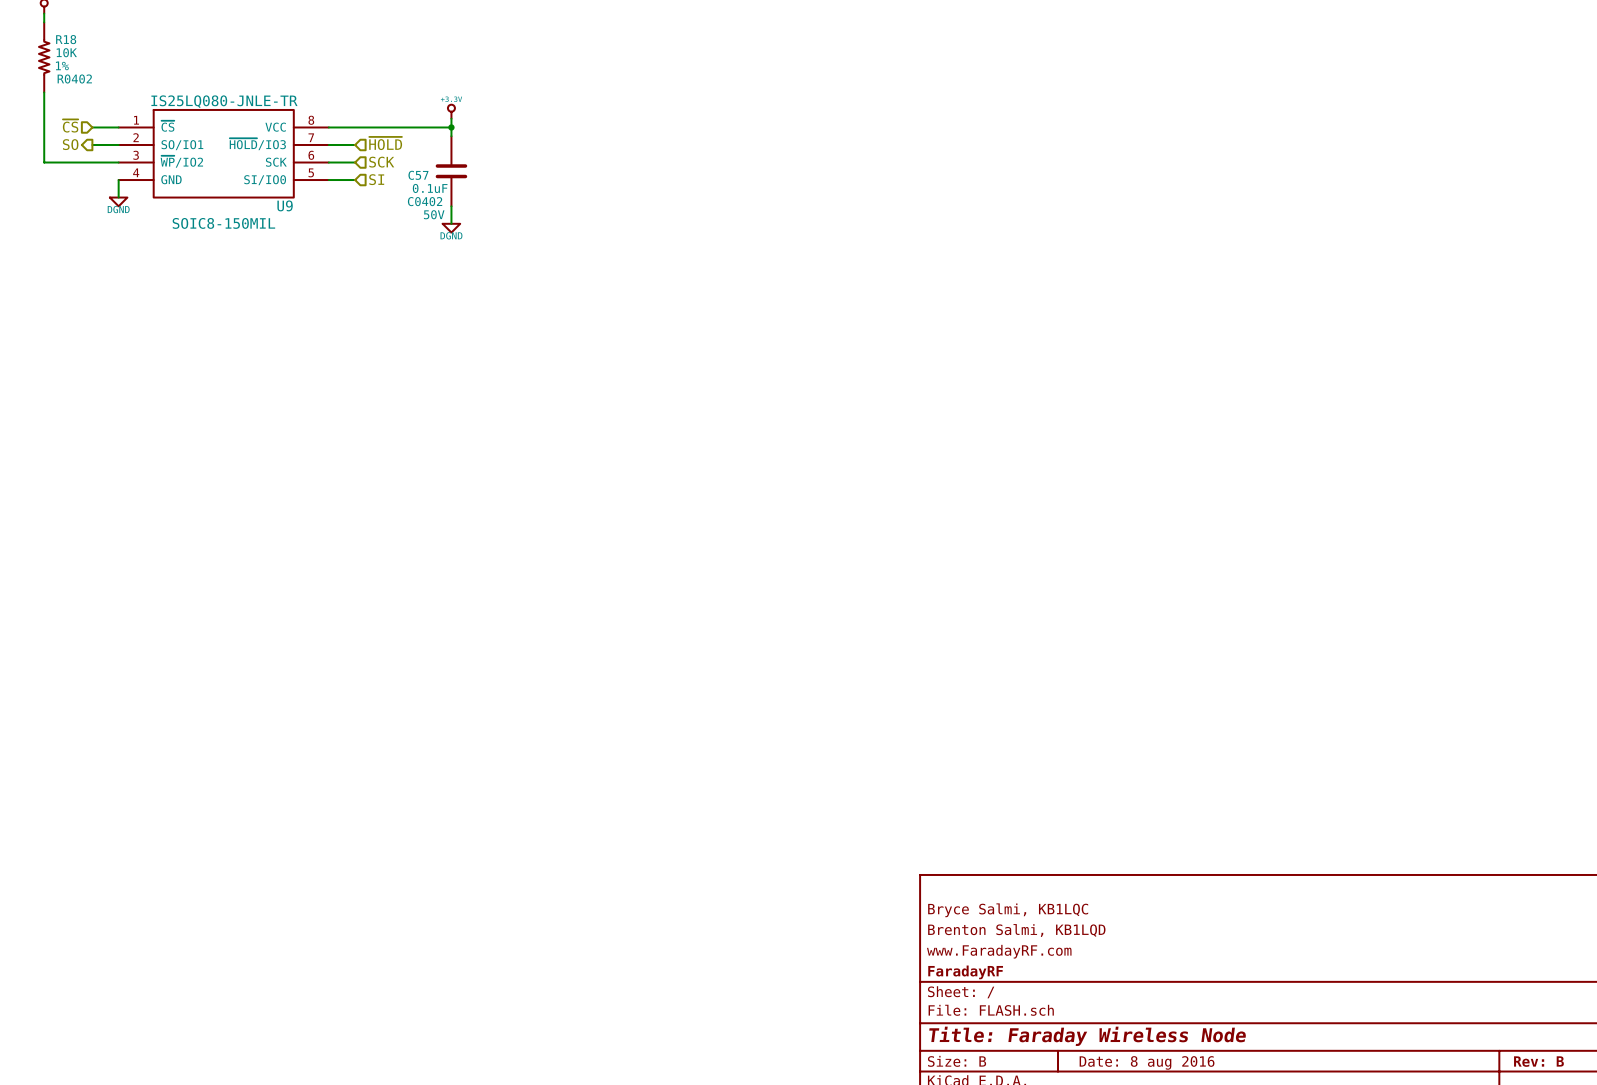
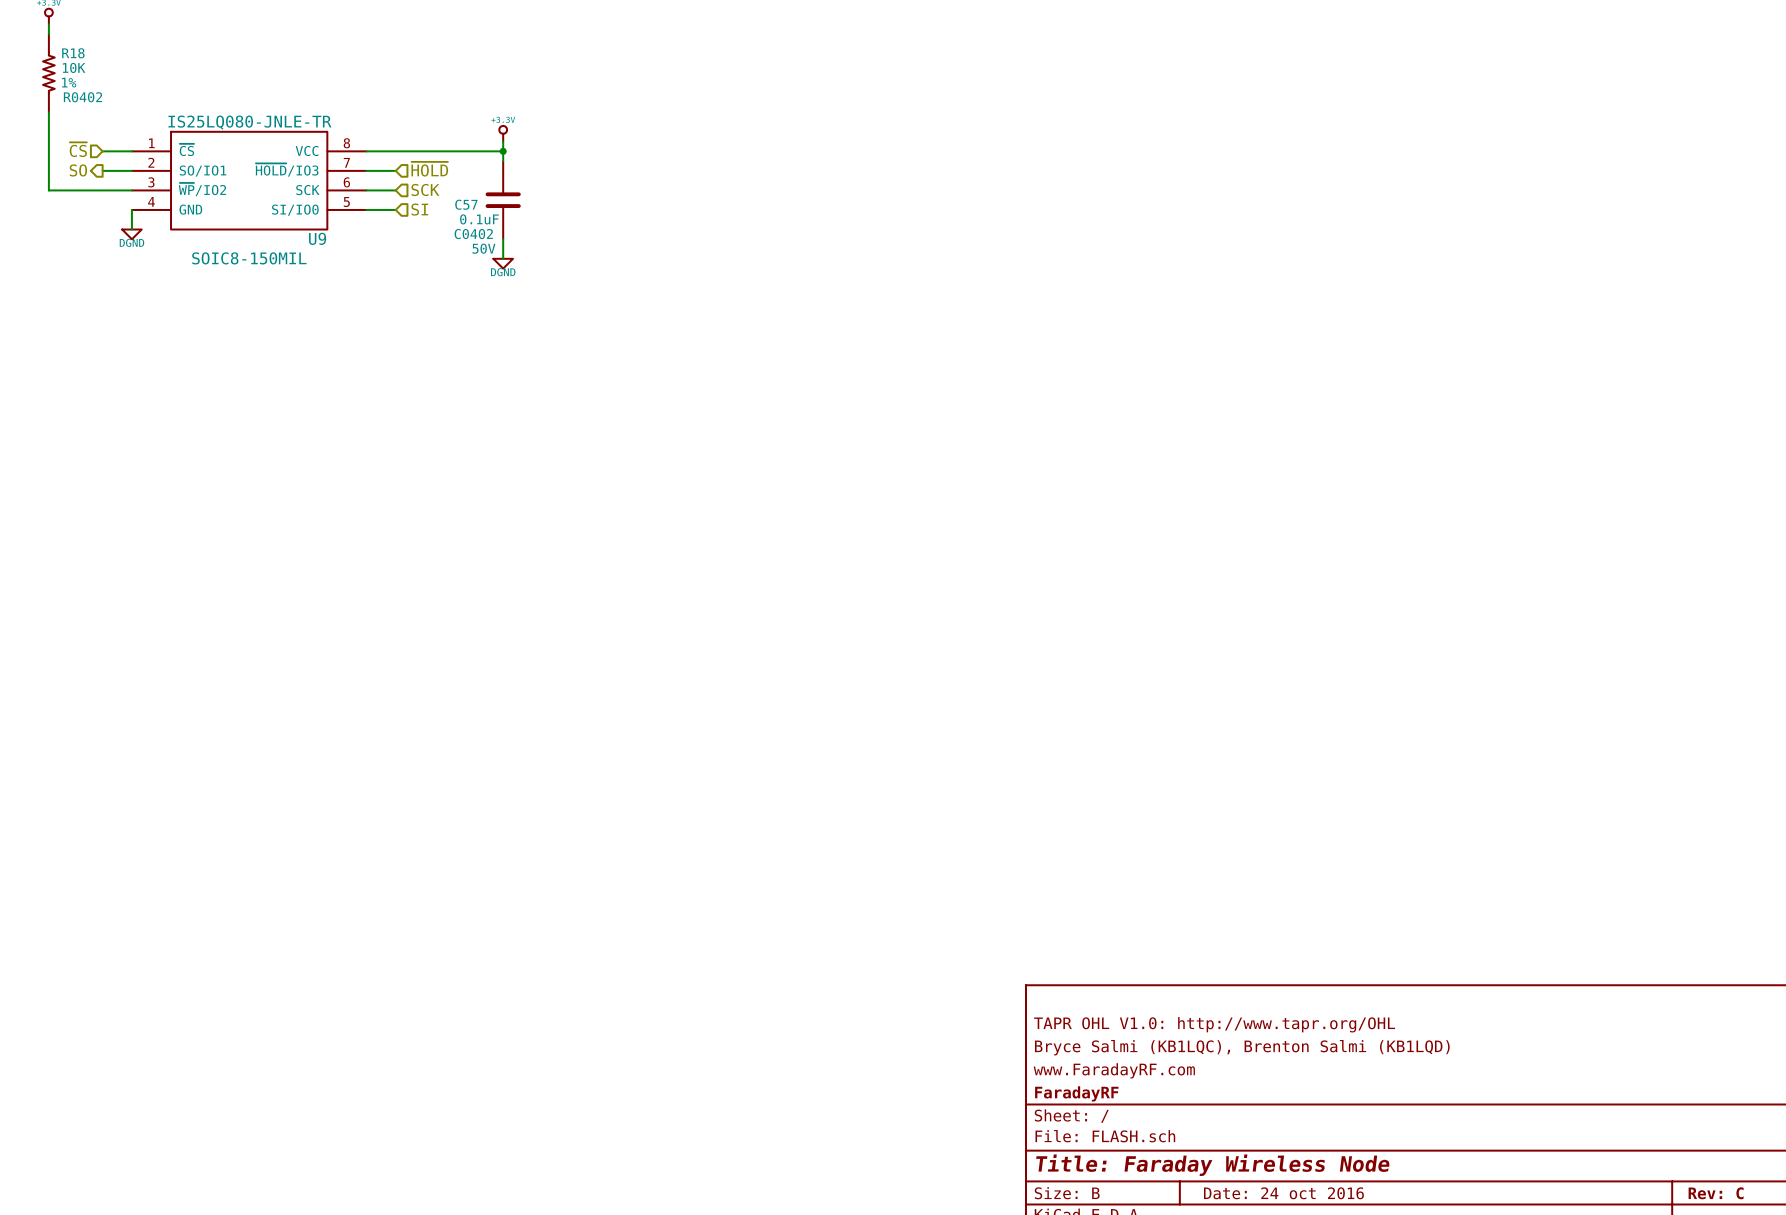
title block: Bryce Salmi, KB1LQC (1008, 910) -> TAPR OHL V1.0: http://www.tapr.org/OHL (1214, 1024)
title block: Brenton Salmi, KB1LQD (1016, 930) -> Bryce Salmi (KB1LQC), Brenton Salmi (KB1LQD) (1242, 1047)
title block: Rev: B (1538, 1061) -> Rev: C (1716, 1193)
title block: Date: 8 aug 2016 (1147, 1062) -> Date: 24 oct 2016 (1283, 1193)

